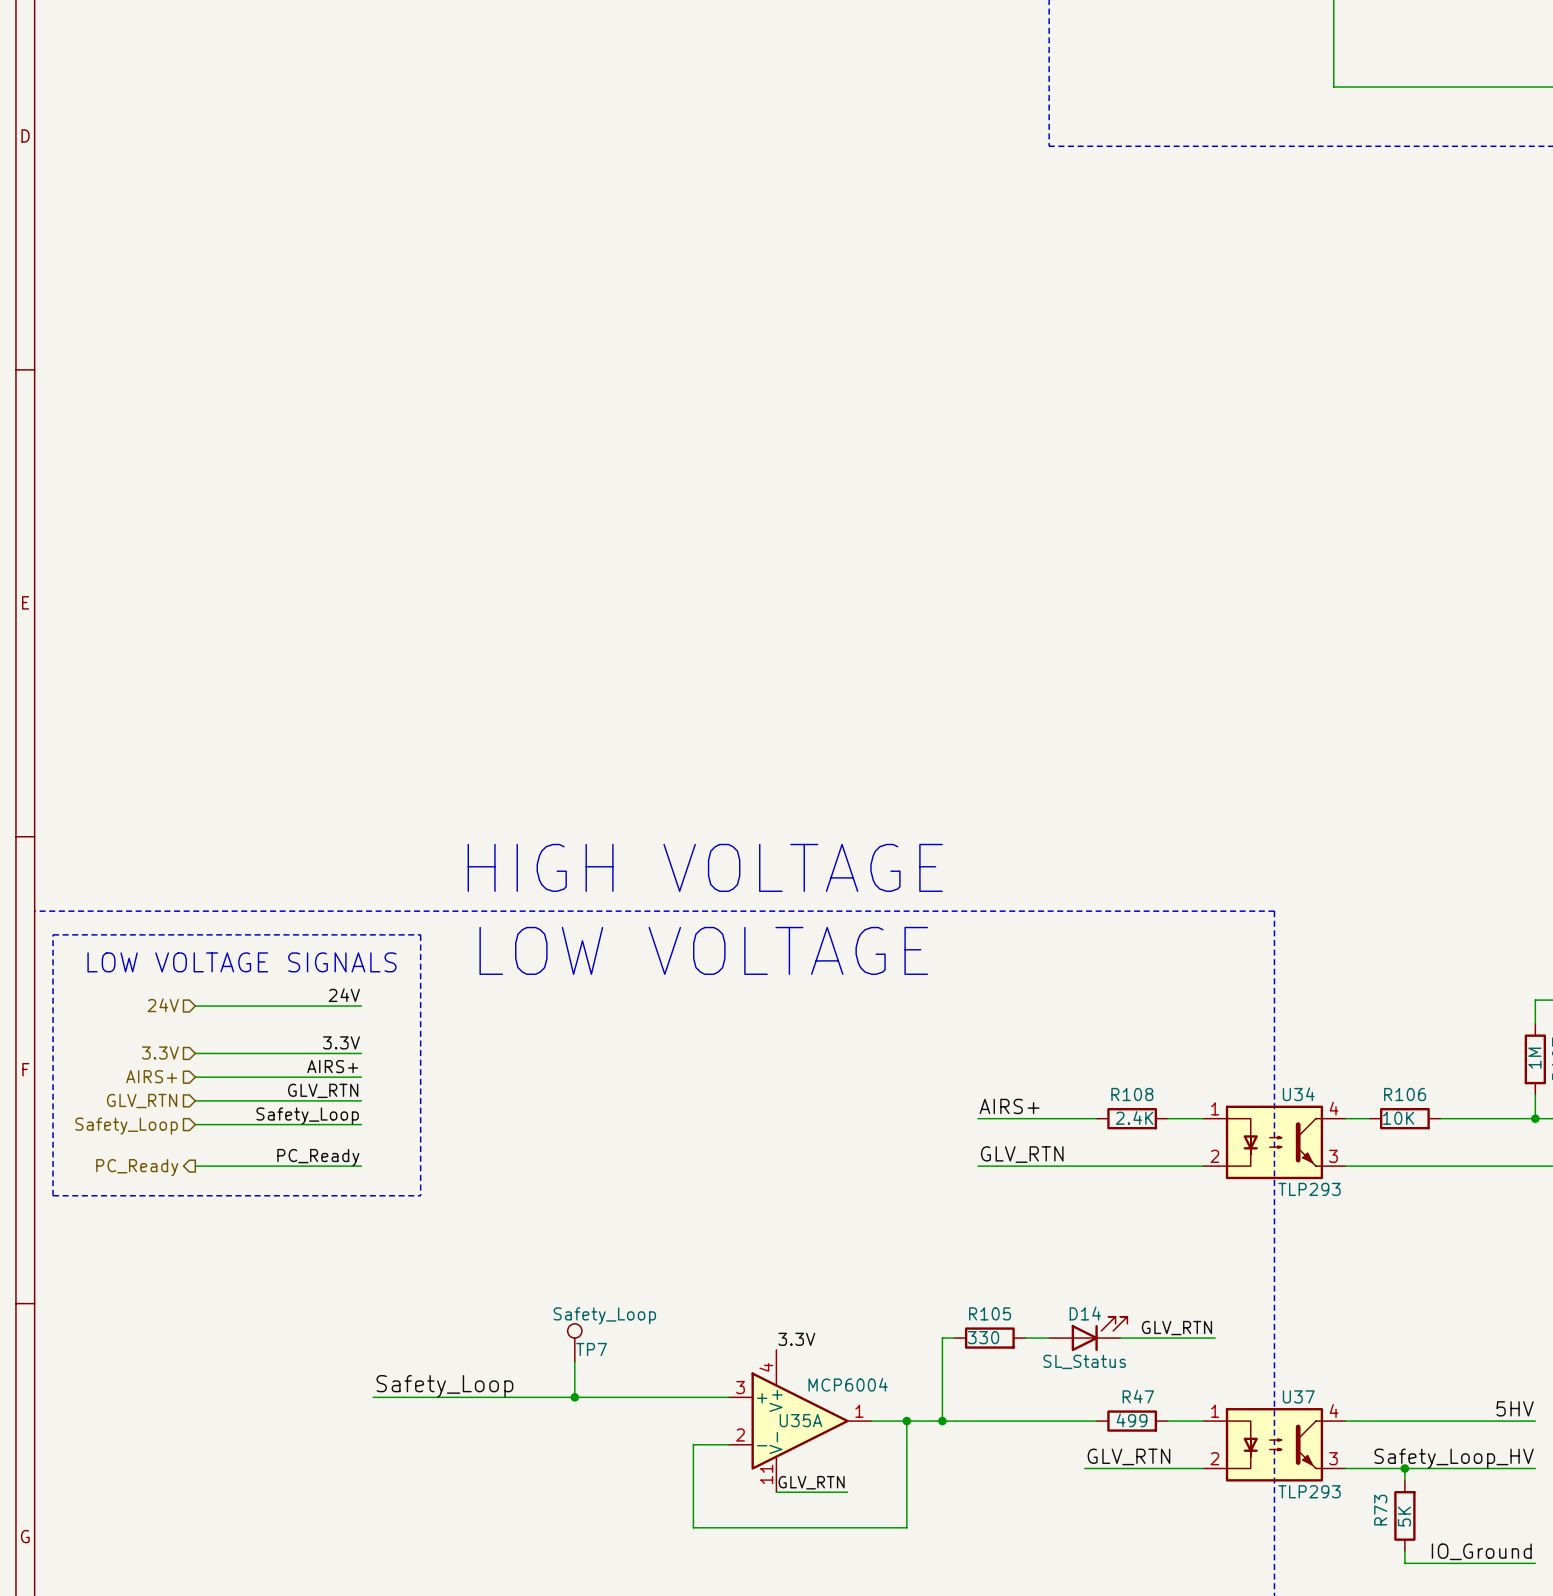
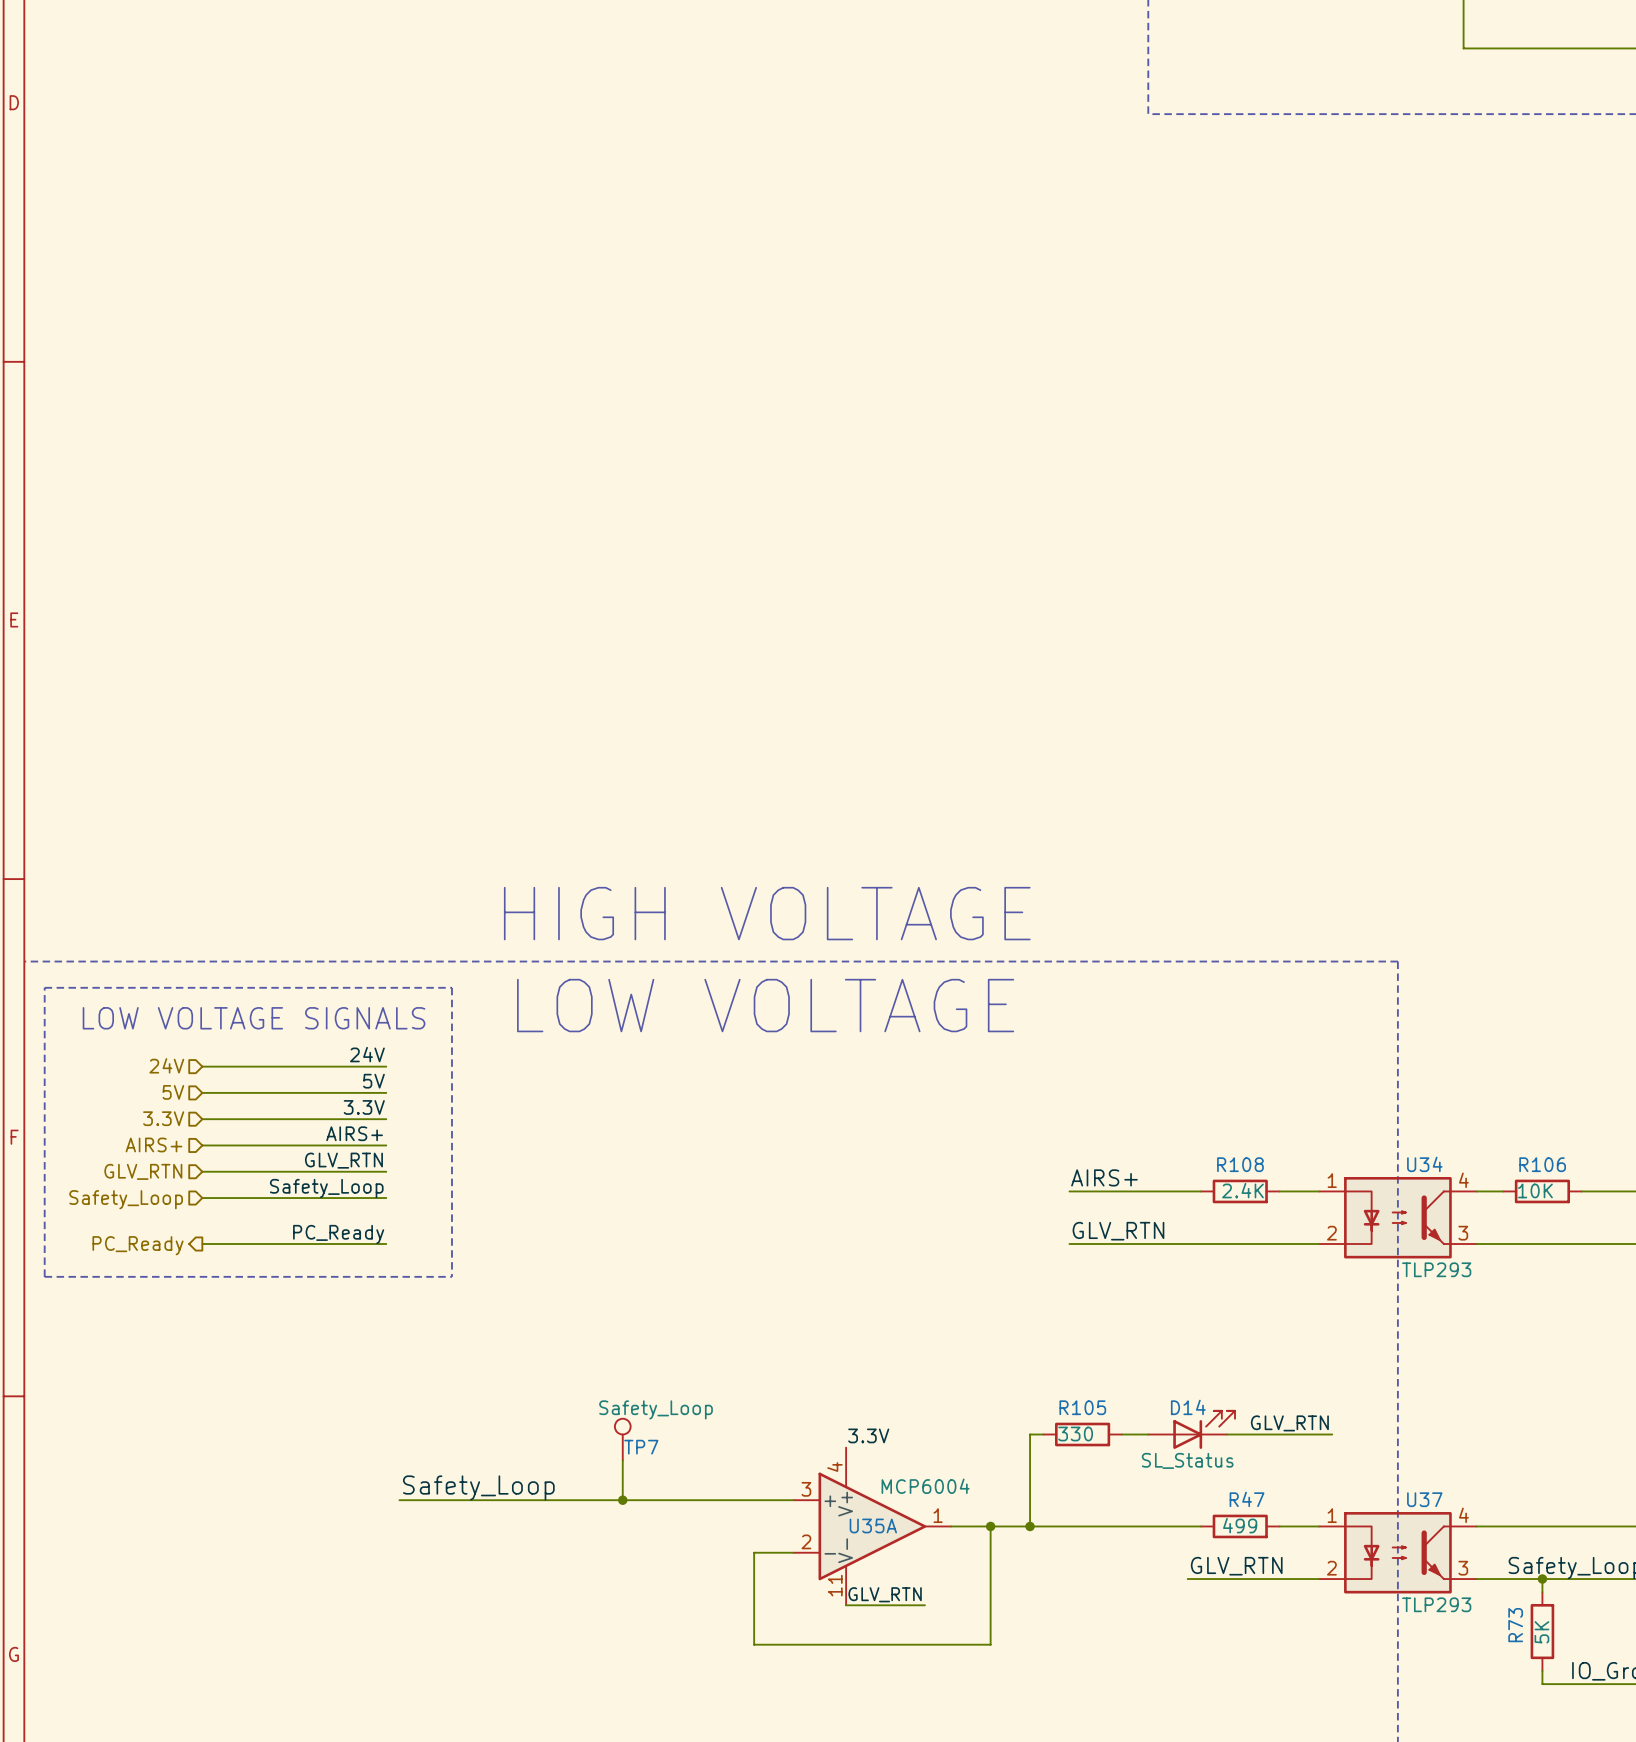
label: none -> 5V (373, 1081)
hierarchical label: none -> 5V (173, 1092)
wire: none -> (202, 1092) (386, 1092)

